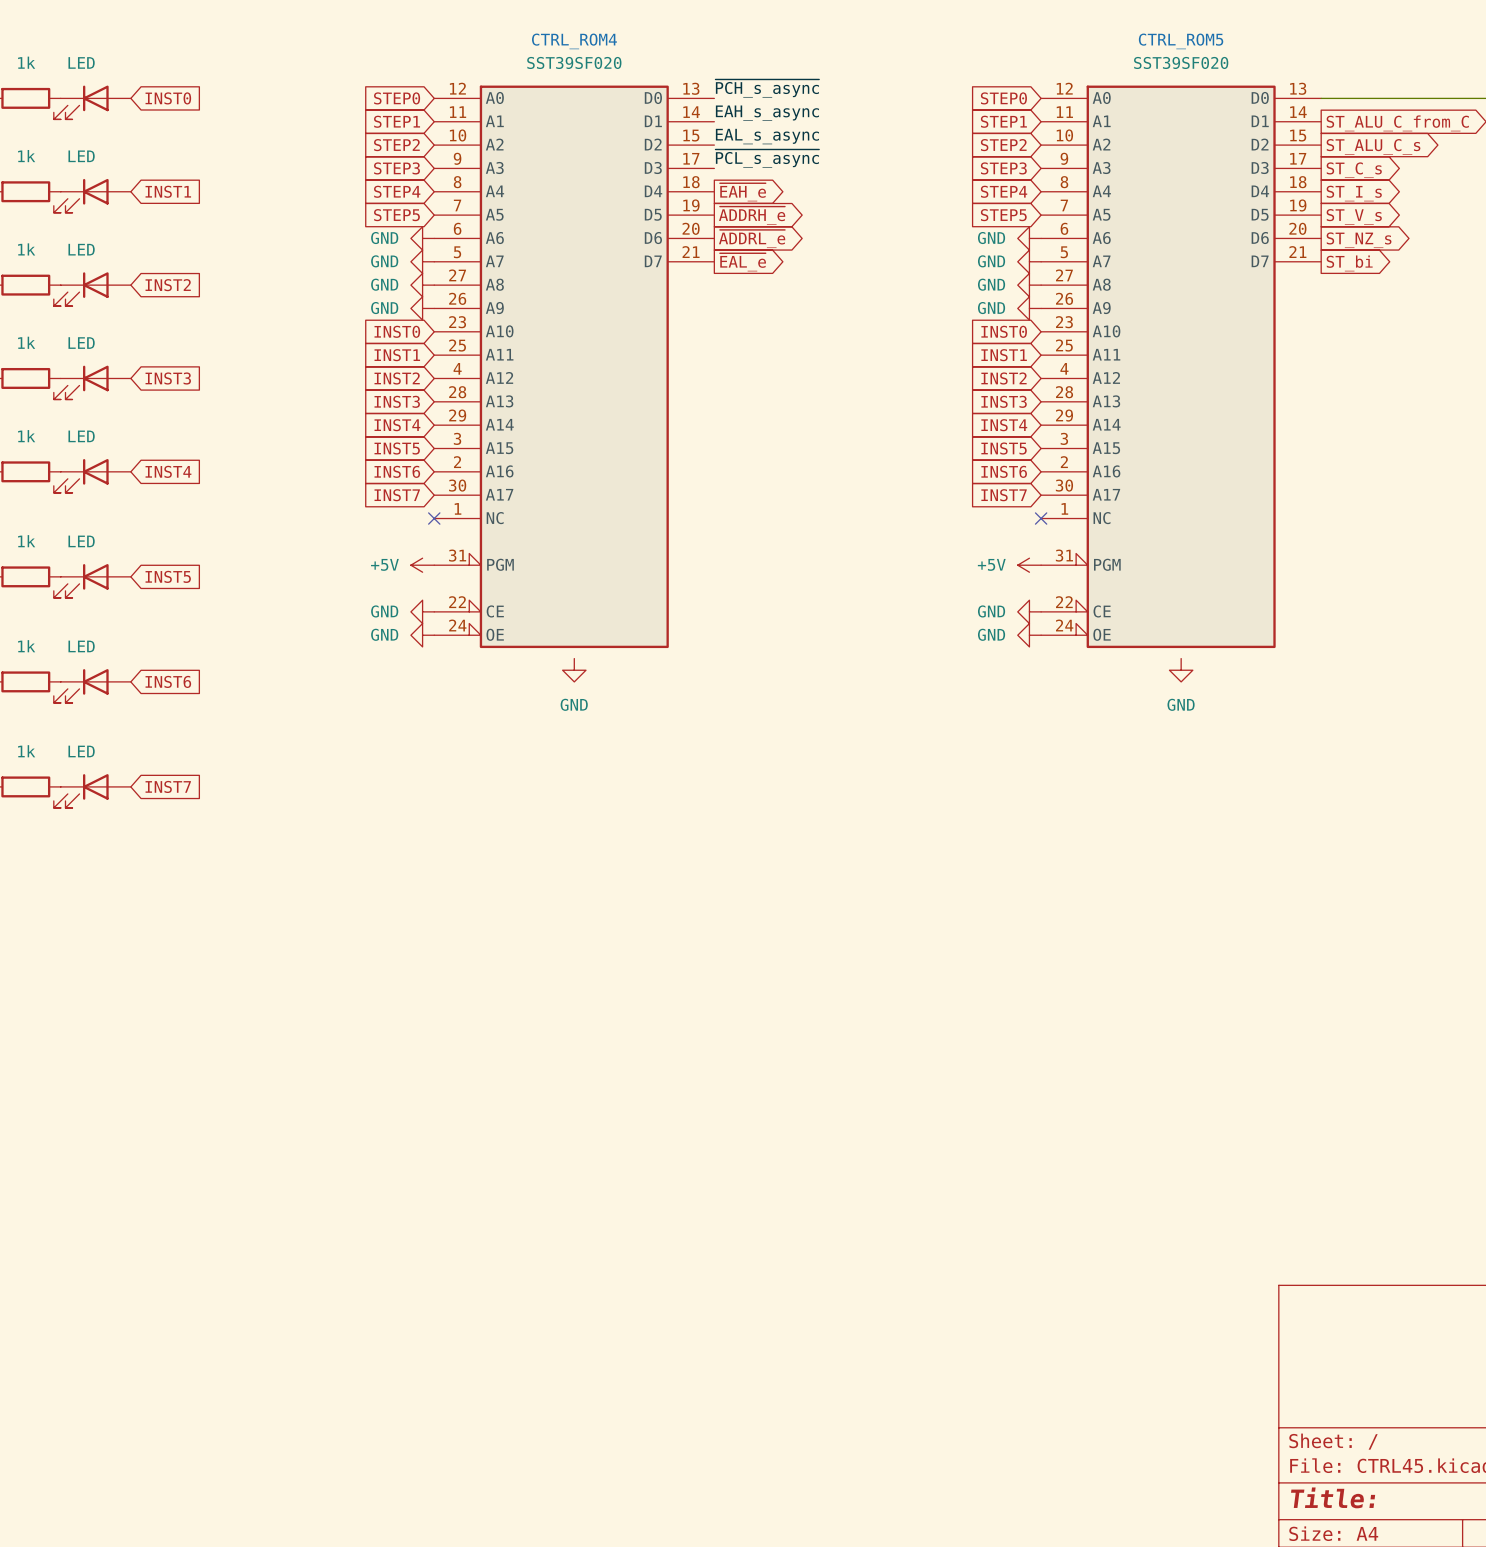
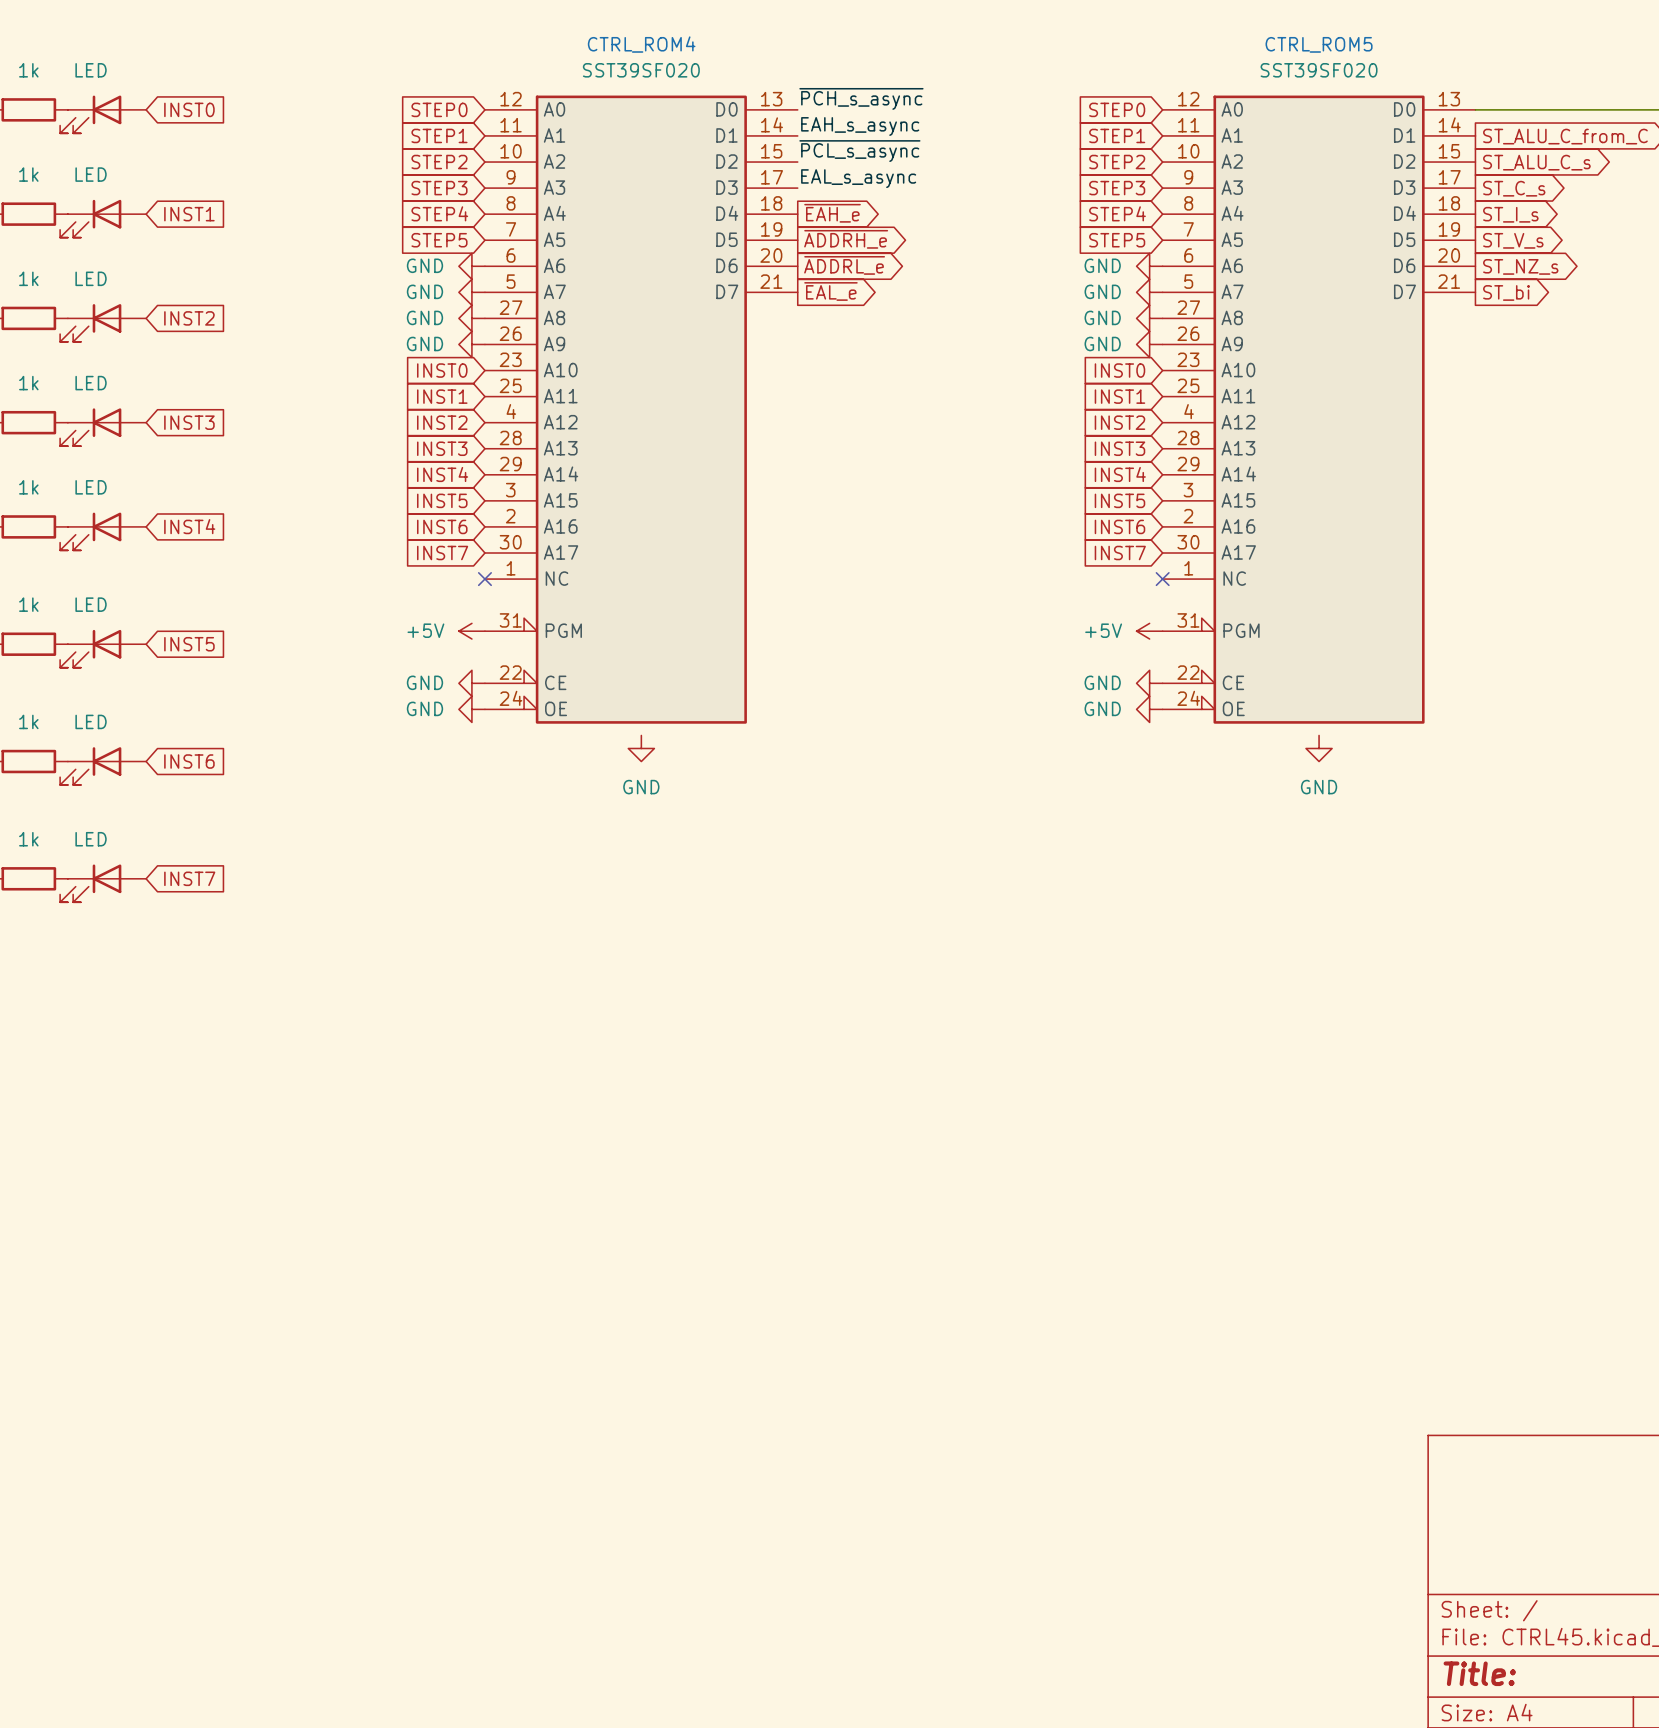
label: EAL_s_async (767, 136) -> ~{PCL_s_async} (859, 151)
label: ~{PCL_s_async} (767, 158) -> EAL_s_async (858, 178)

